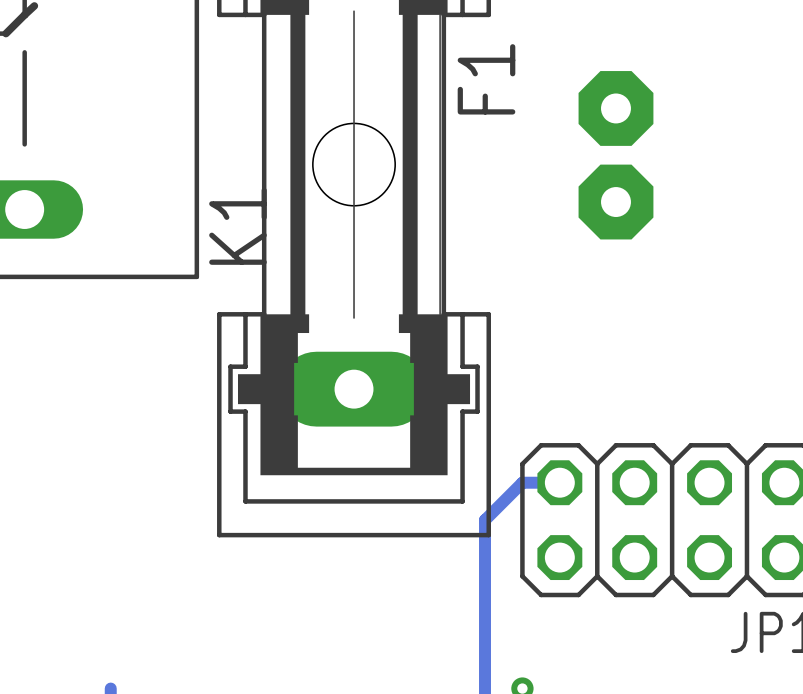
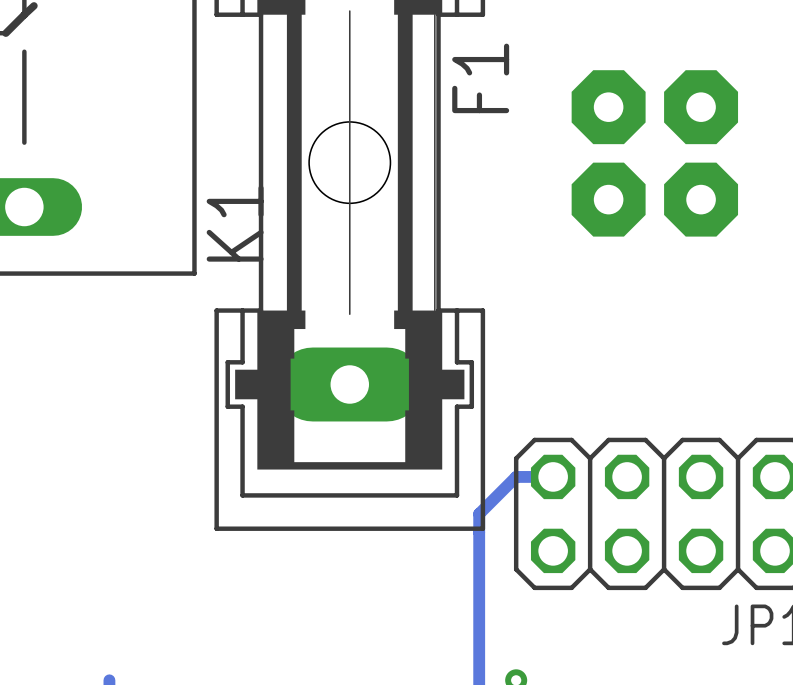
part: none -> (701, 107)
part: none -> (701, 199)

